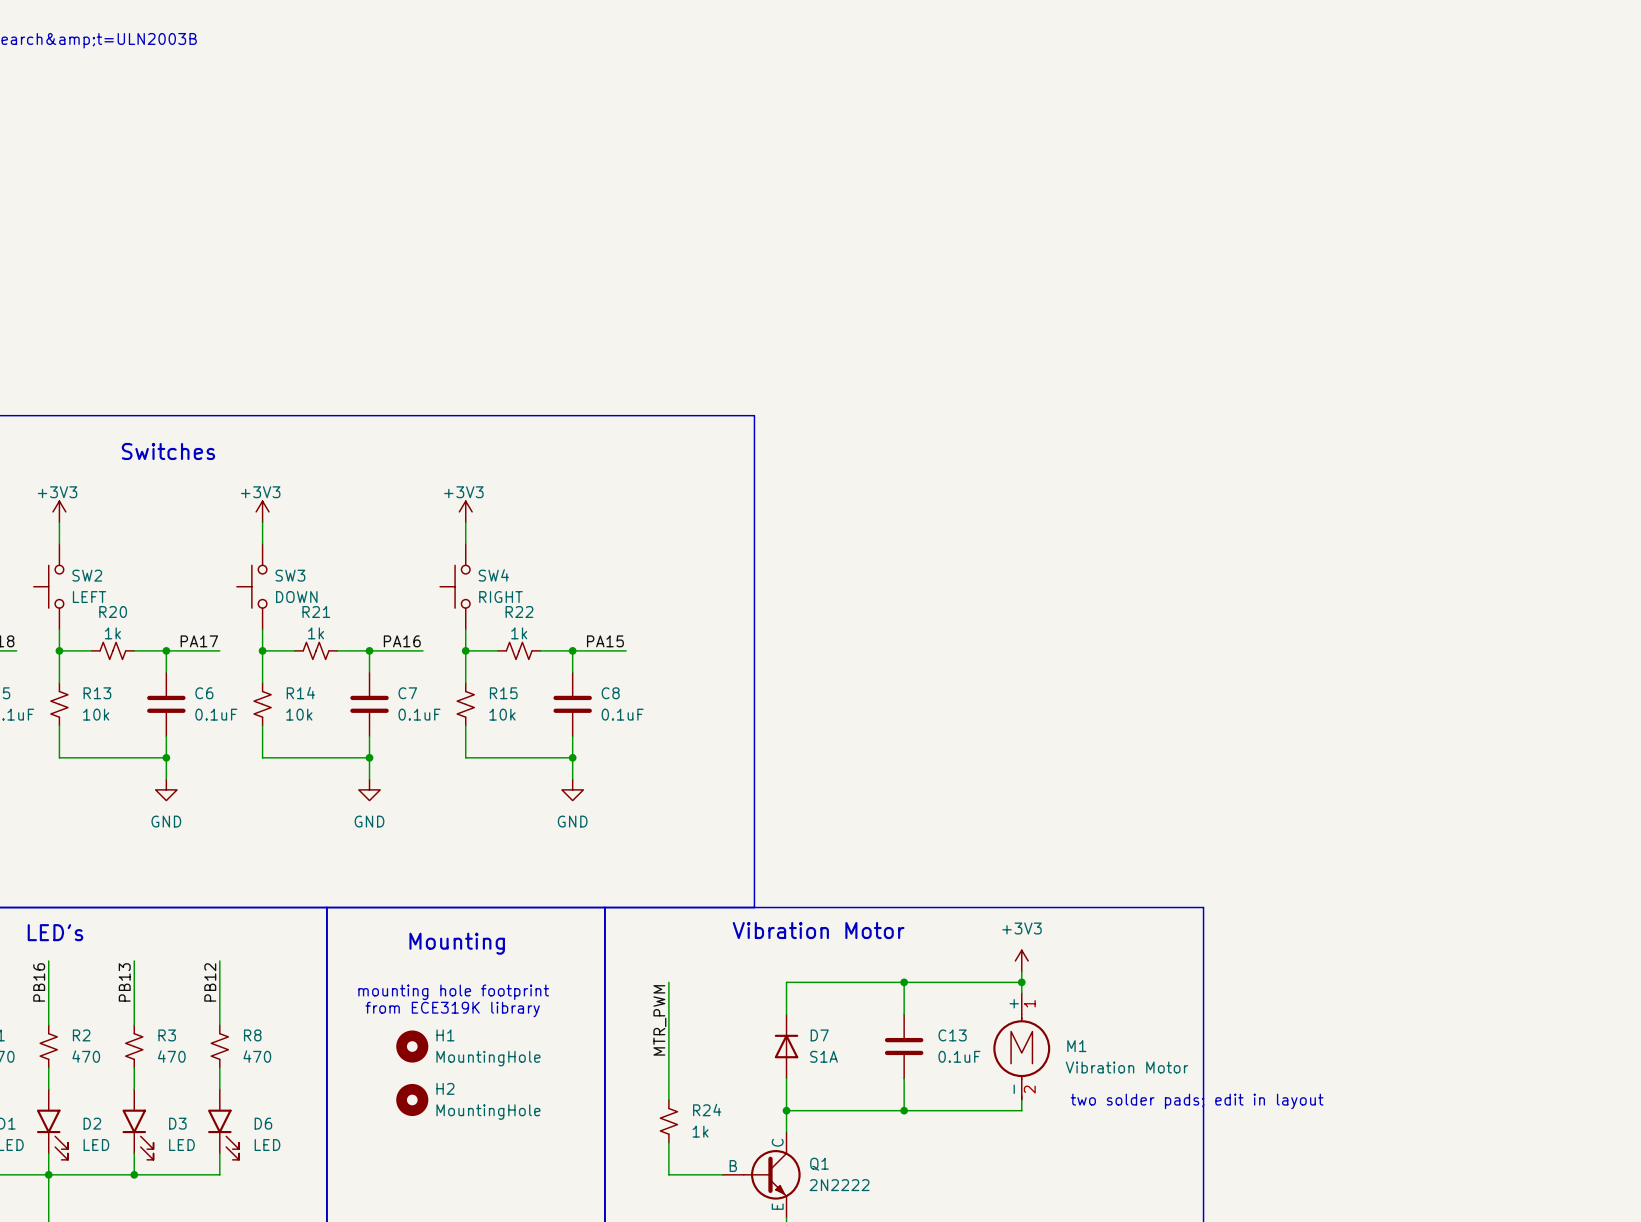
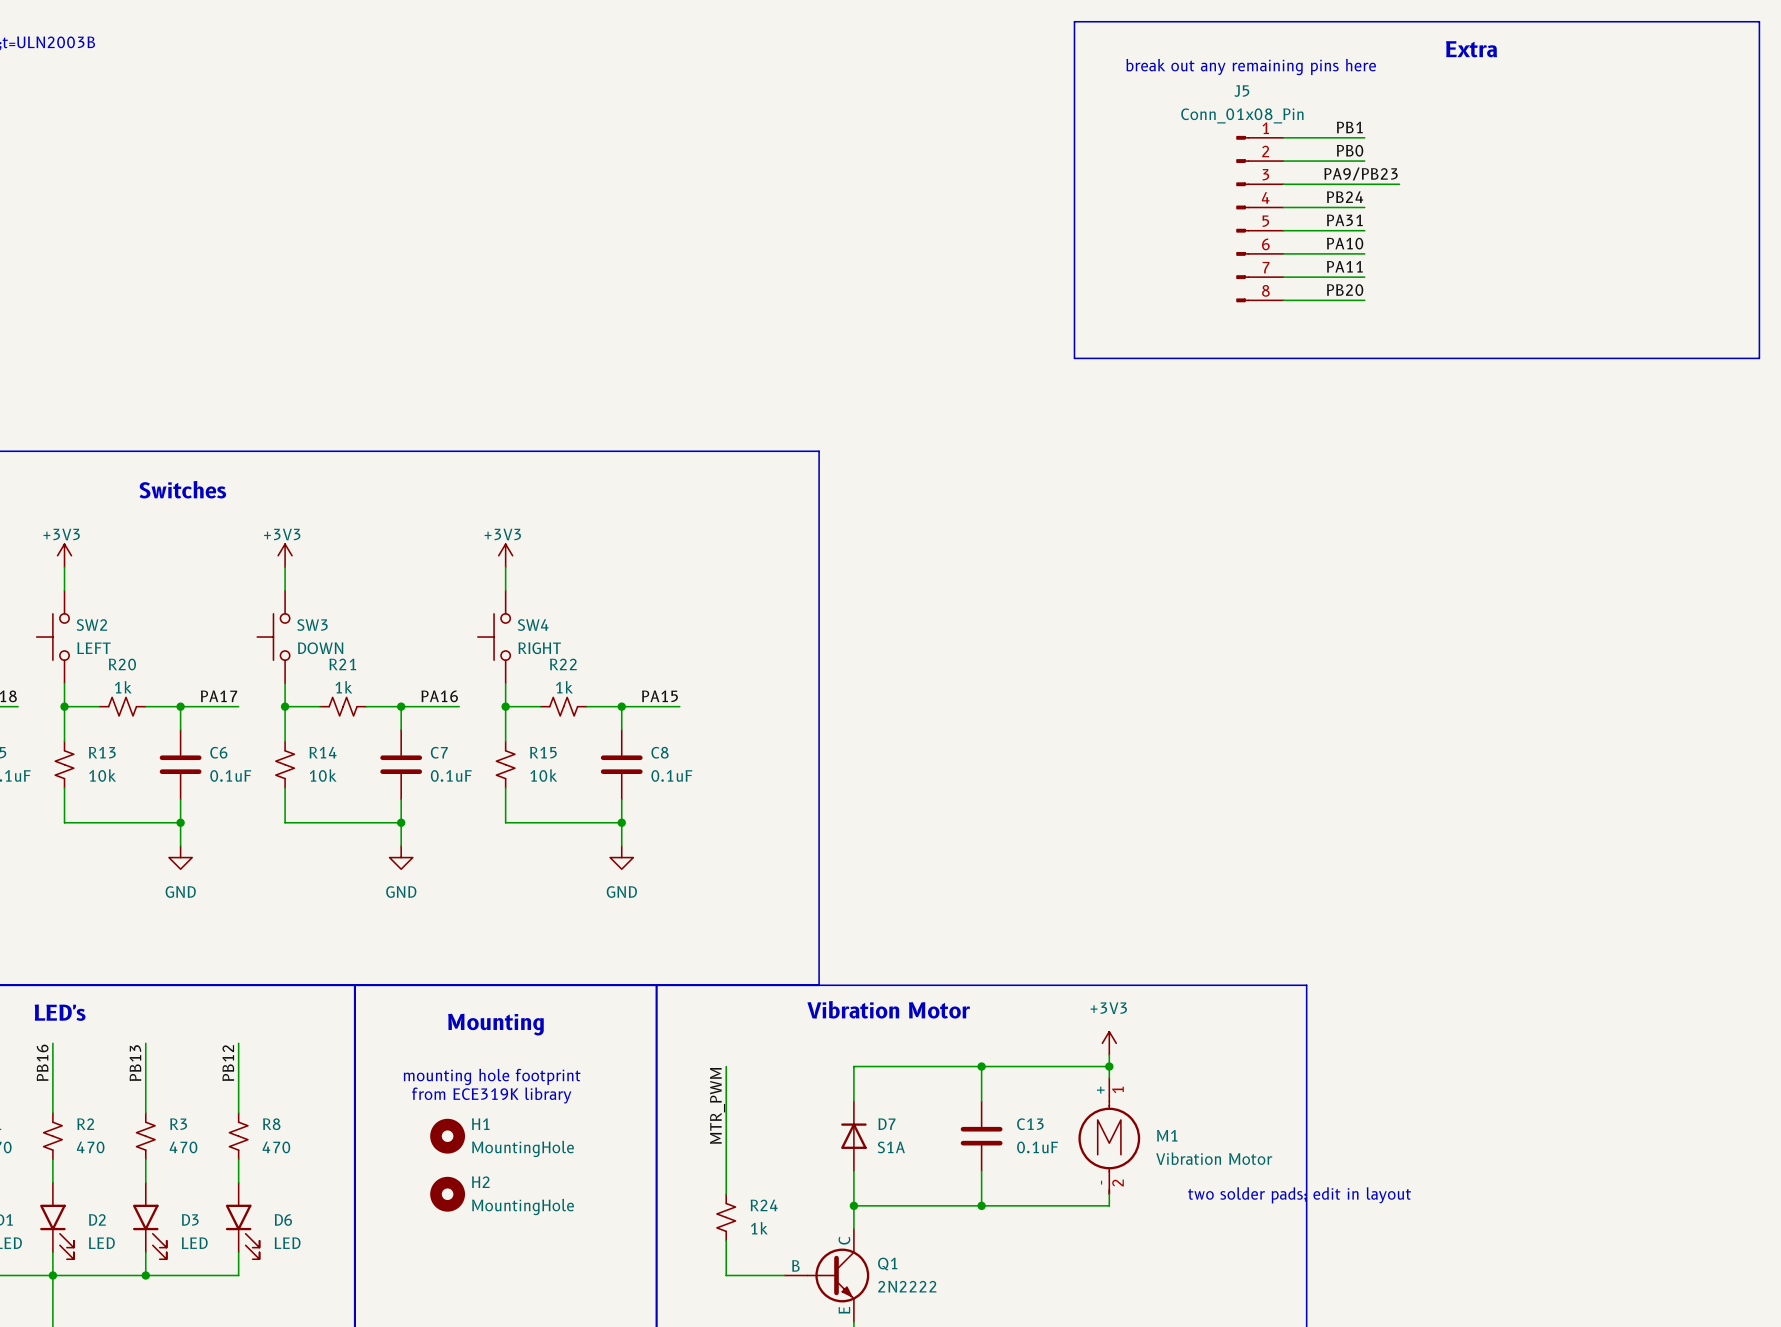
line: none -> (1074, 21) (1759, 21) (1759, 358) (1074, 358) (1074, 21)
text: none -> Extra (1471, 49)
text: none -> break out any remaining pins here (1251, 67)
label: none -> PB1 (1349, 127)
wire: none -> (1283, 137) (1364, 137)
label: none -> PB0 (1350, 150)
wire: none -> (1283, 161) (1364, 161)
label: none -> PA9/PB23 (1361, 173)
wire: none -> (1283, 184) (1399, 184)
label: none -> PB24 (1345, 197)
wire: none -> (1283, 207) (1364, 207)
J5: none -> Conn_01x08_Pin (1259, 219)
label: none -> PA31 (1344, 220)
wire: none -> (1283, 230) (1364, 230)
label: none -> PA10 (1345, 243)
wire: none -> (1283, 253) (1364, 253)
label: none -> PA11 (1344, 266)
wire: none -> (1283, 277) (1364, 277)
label: none -> PB20 (1345, 290)
wire: none -> (1283, 300) (1364, 300)

